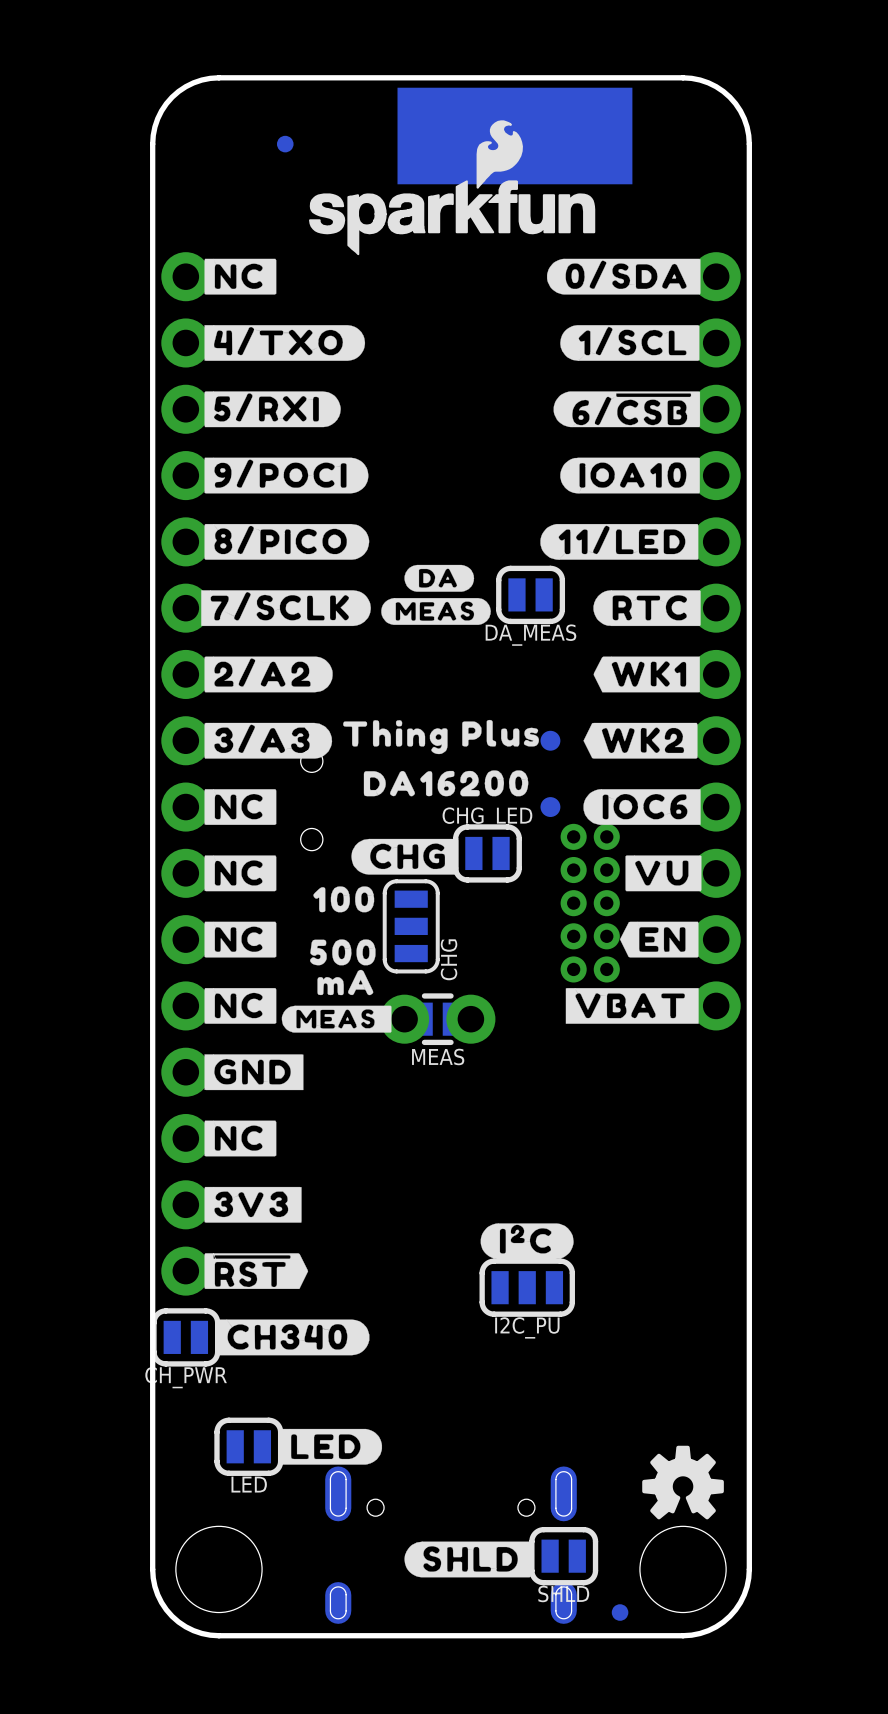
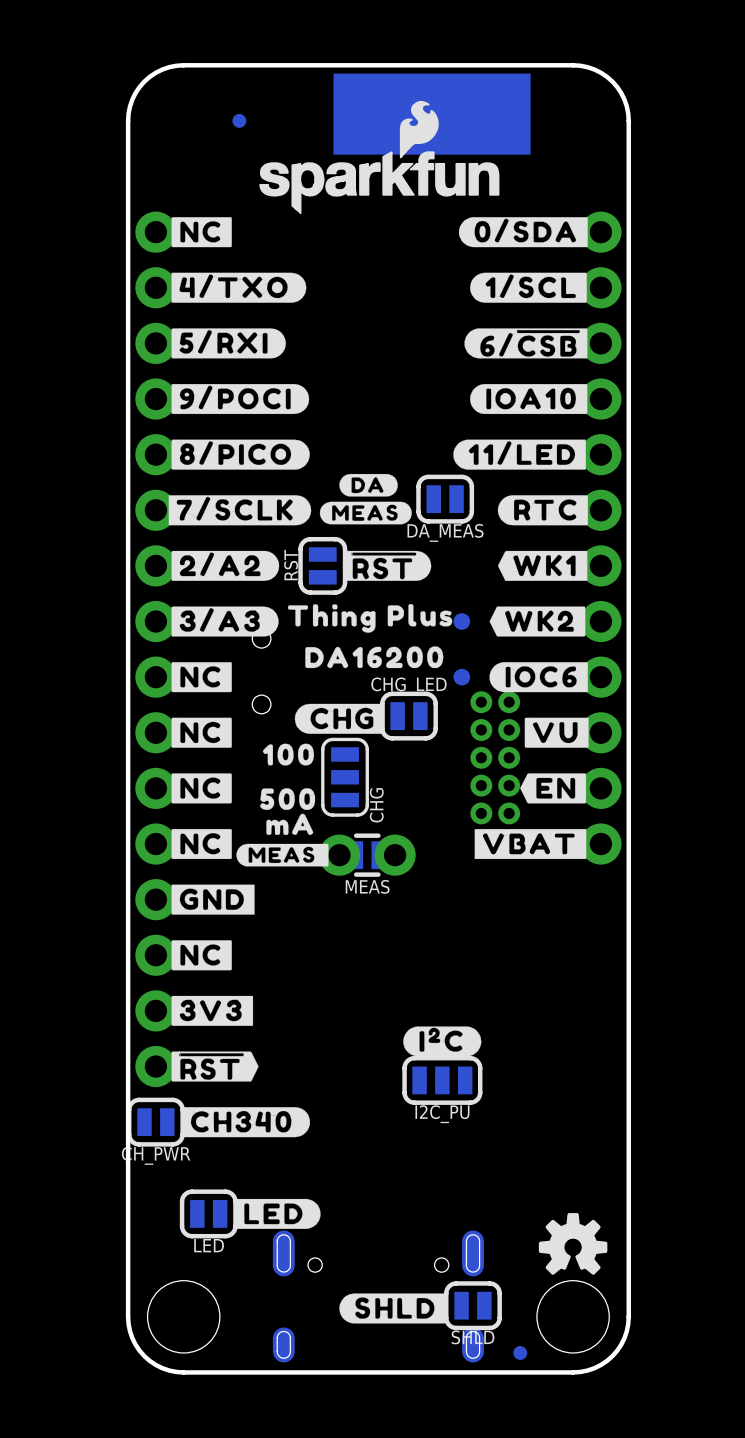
drawing: none -> [344, 550, 432, 581]
RST: none -> (322, 565)

